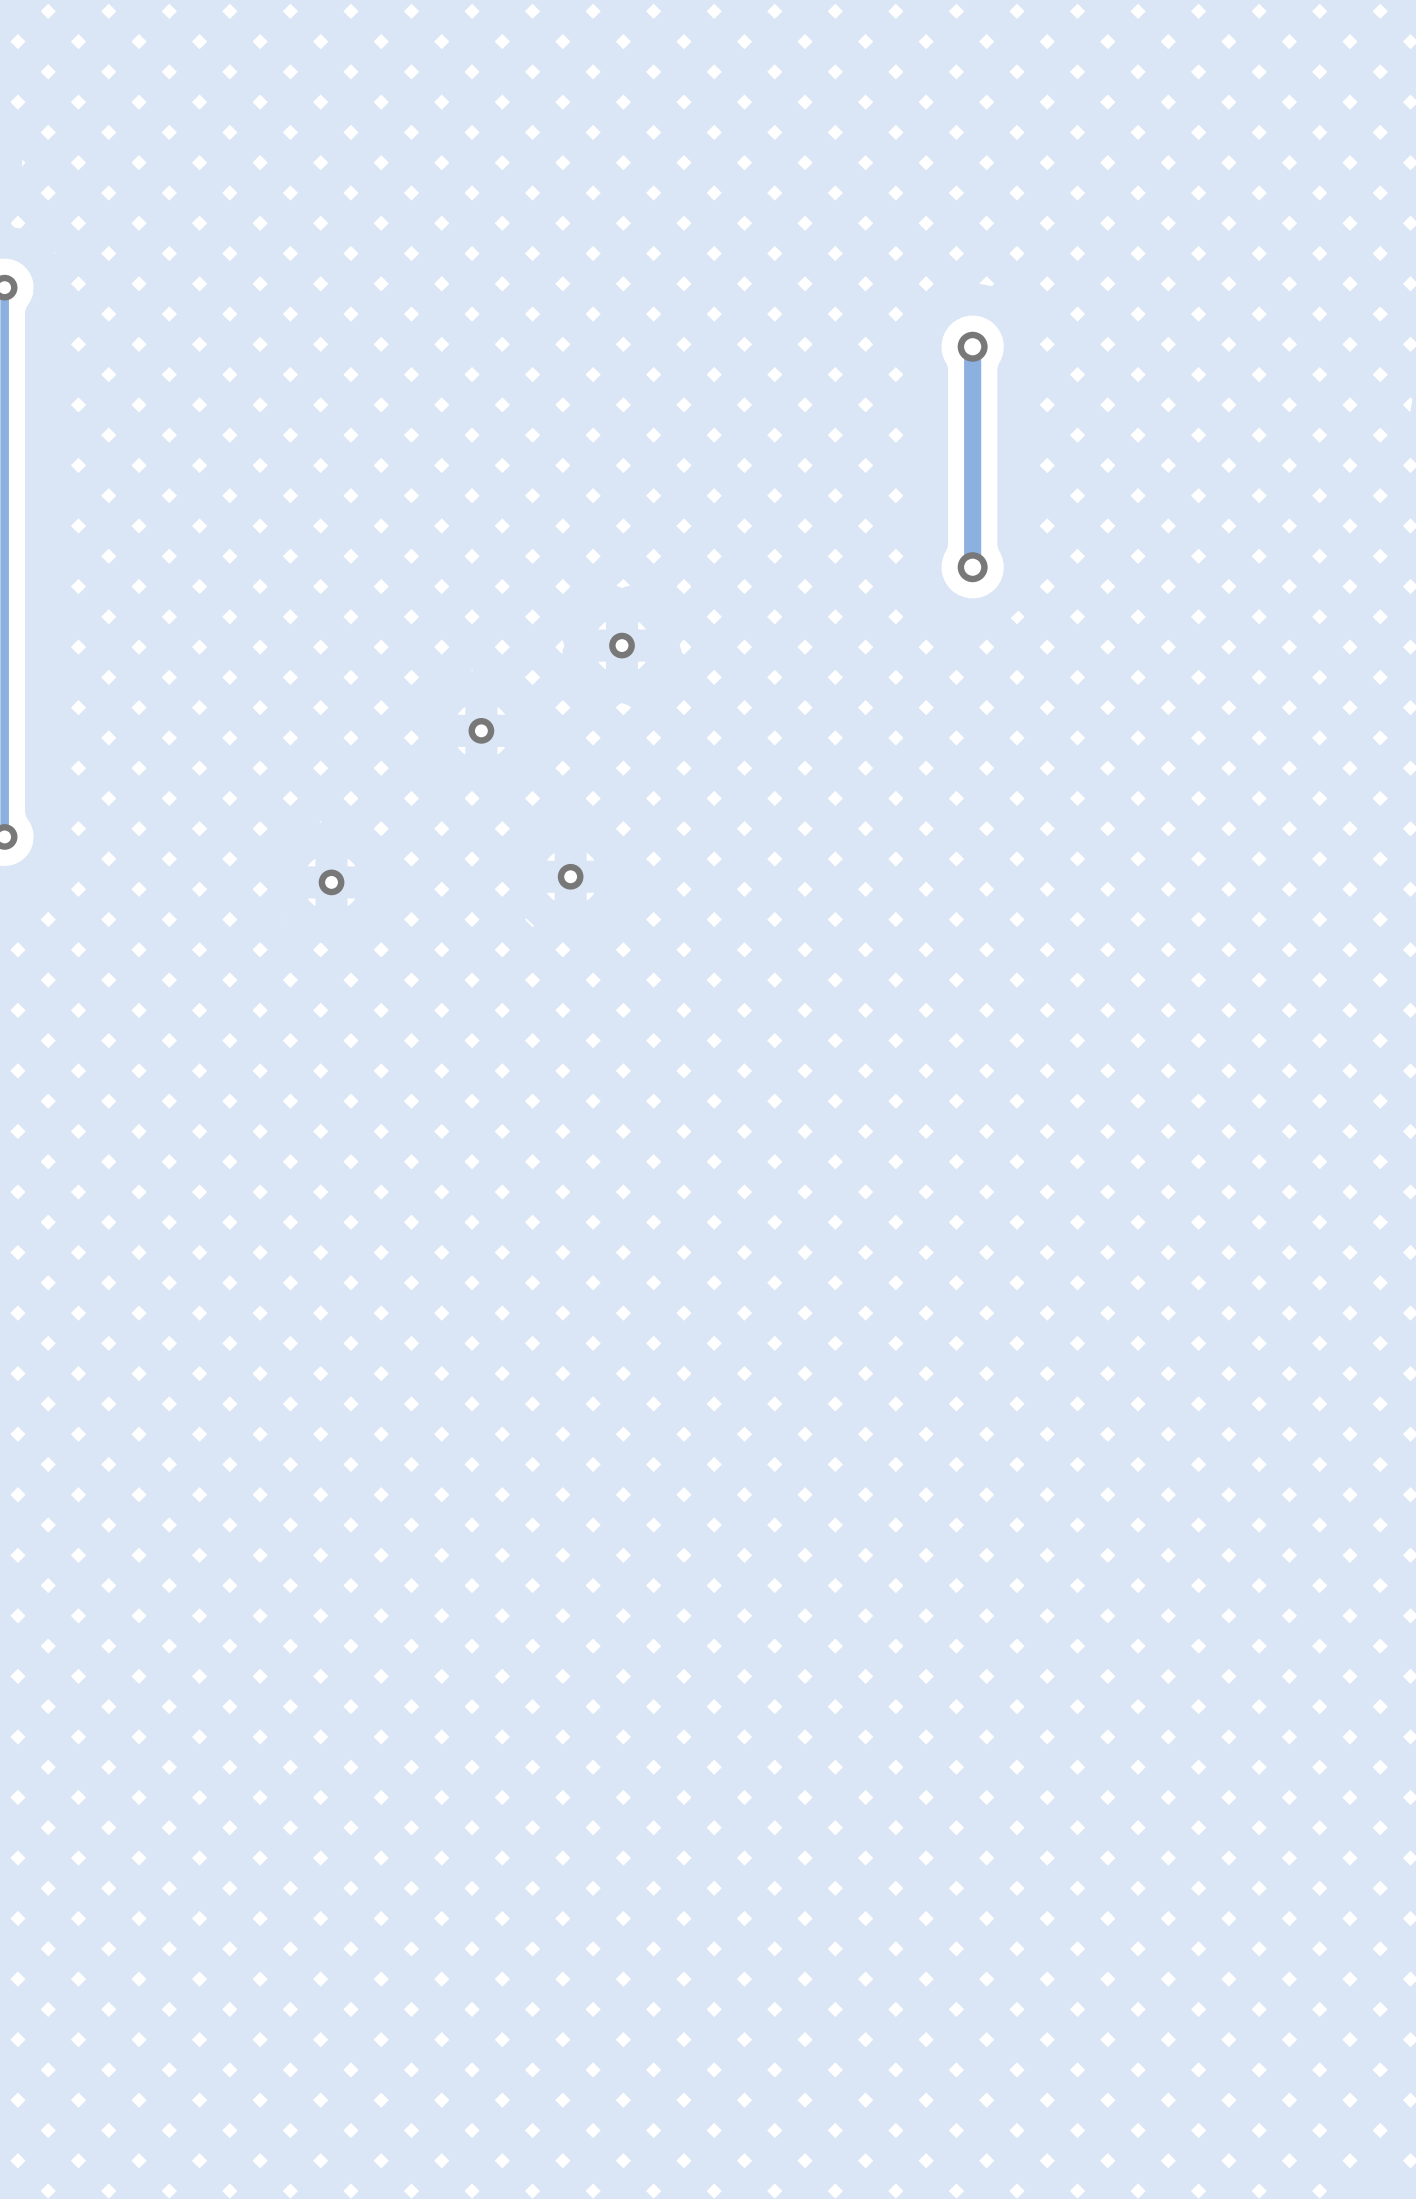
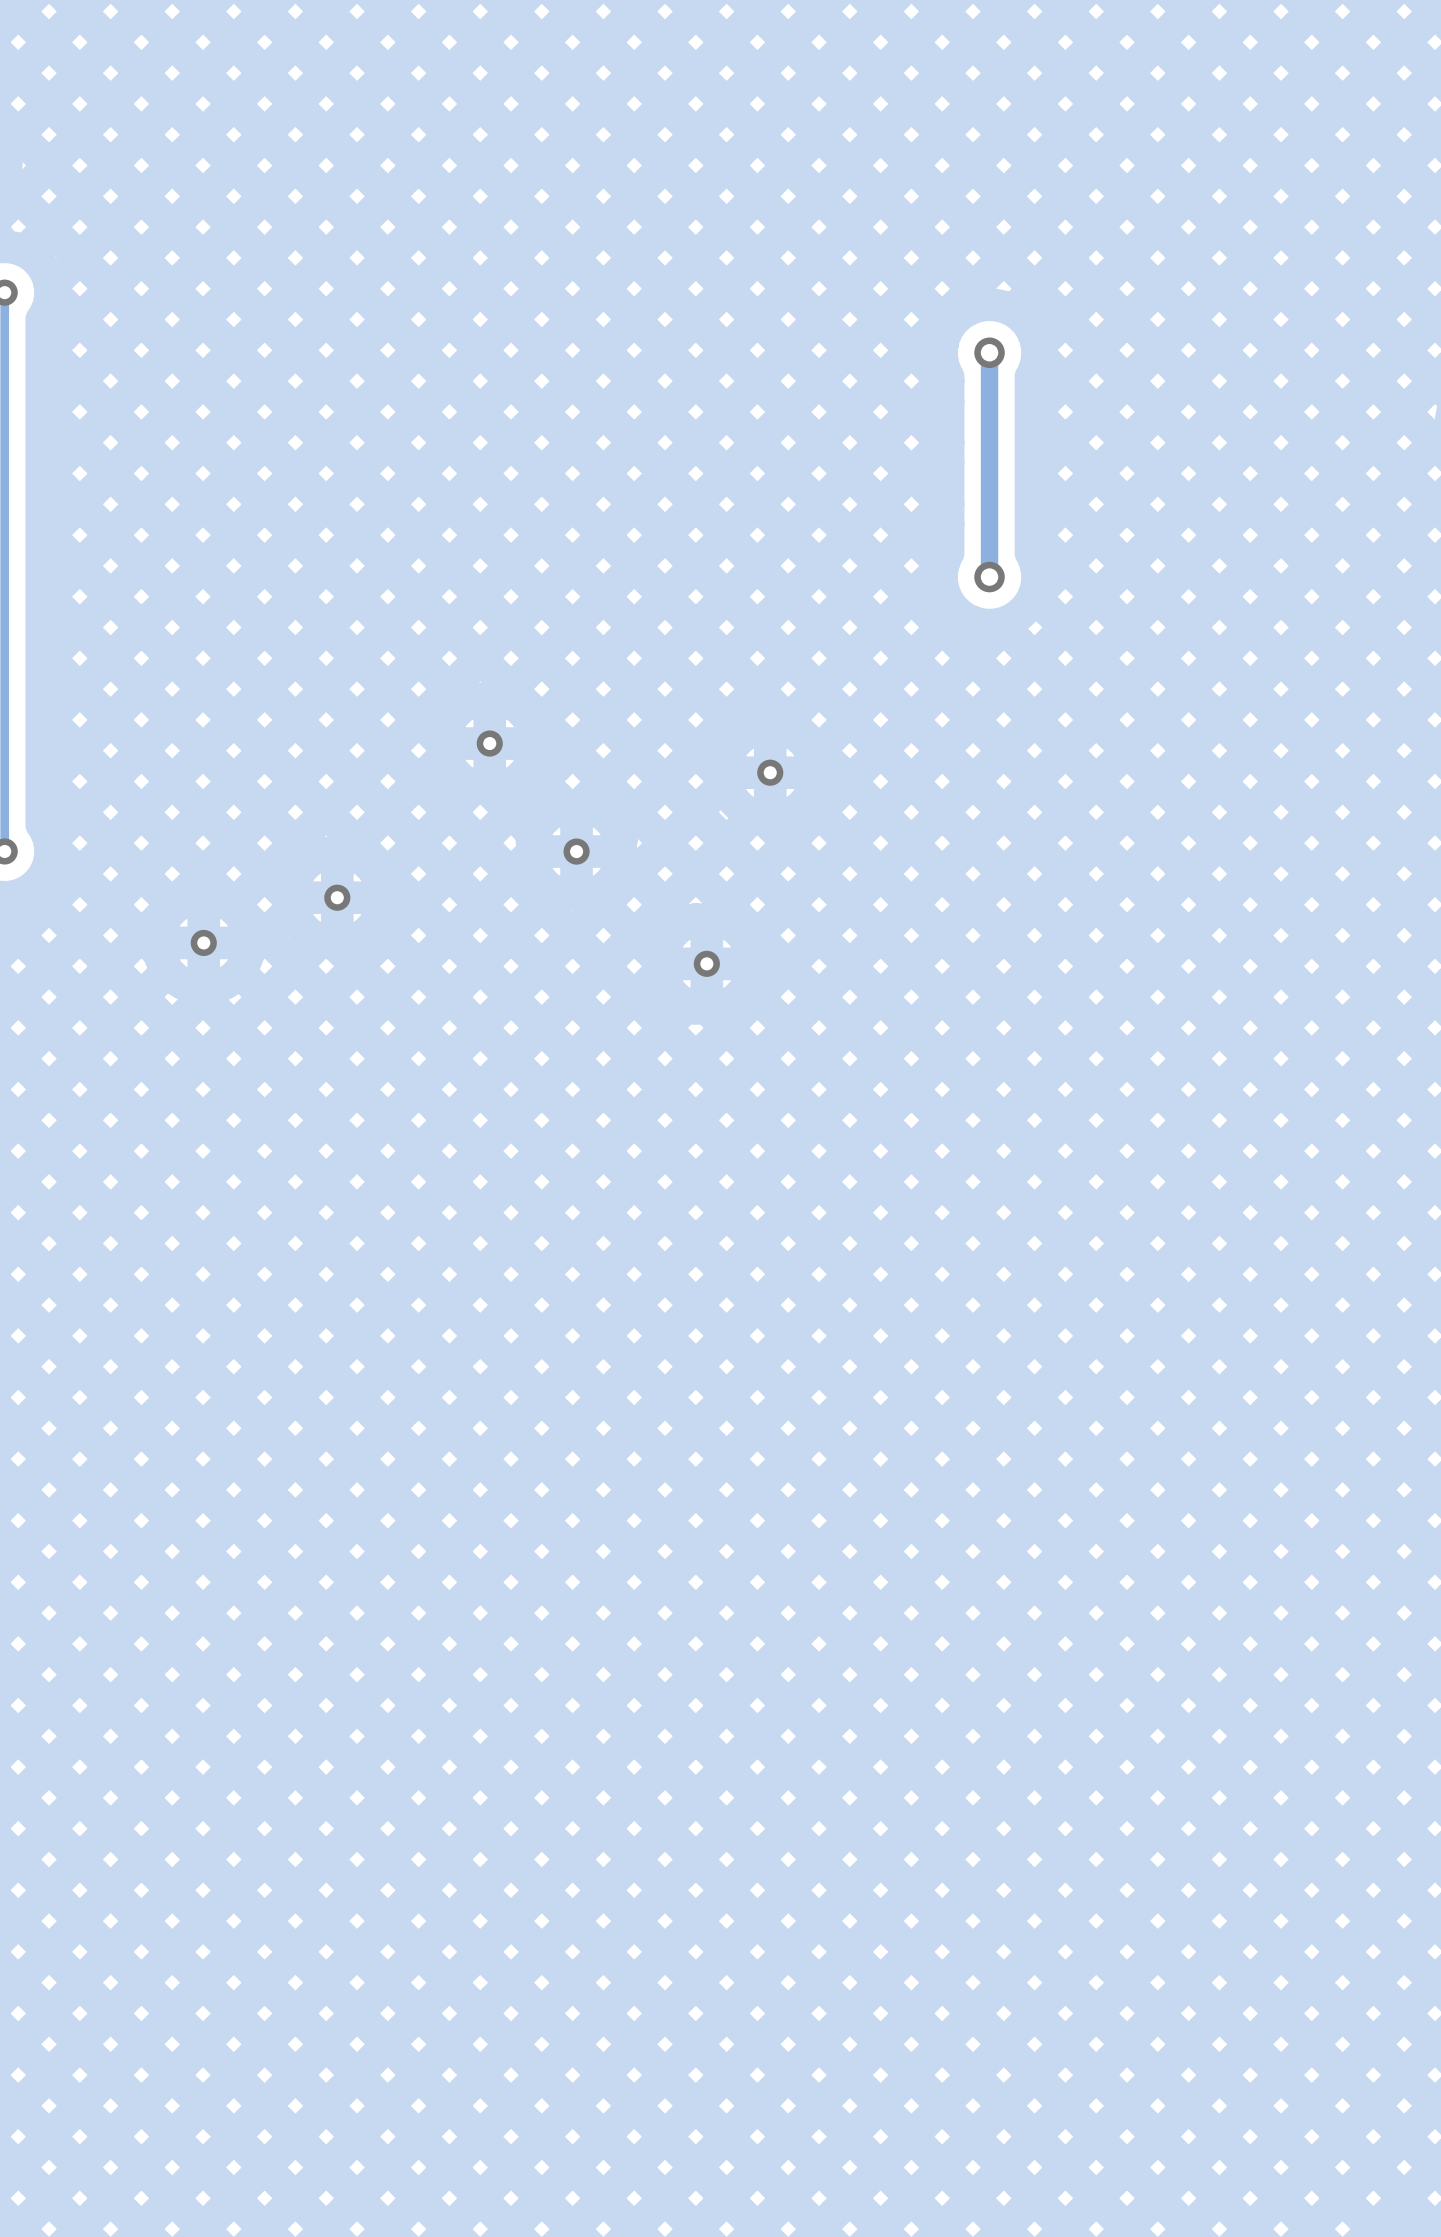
via: (622, 645) -> none
via: none -> (770, 772)
via position: (570, 876) -> (576, 851)
via: none -> (203, 942)
via: none -> (706, 963)

